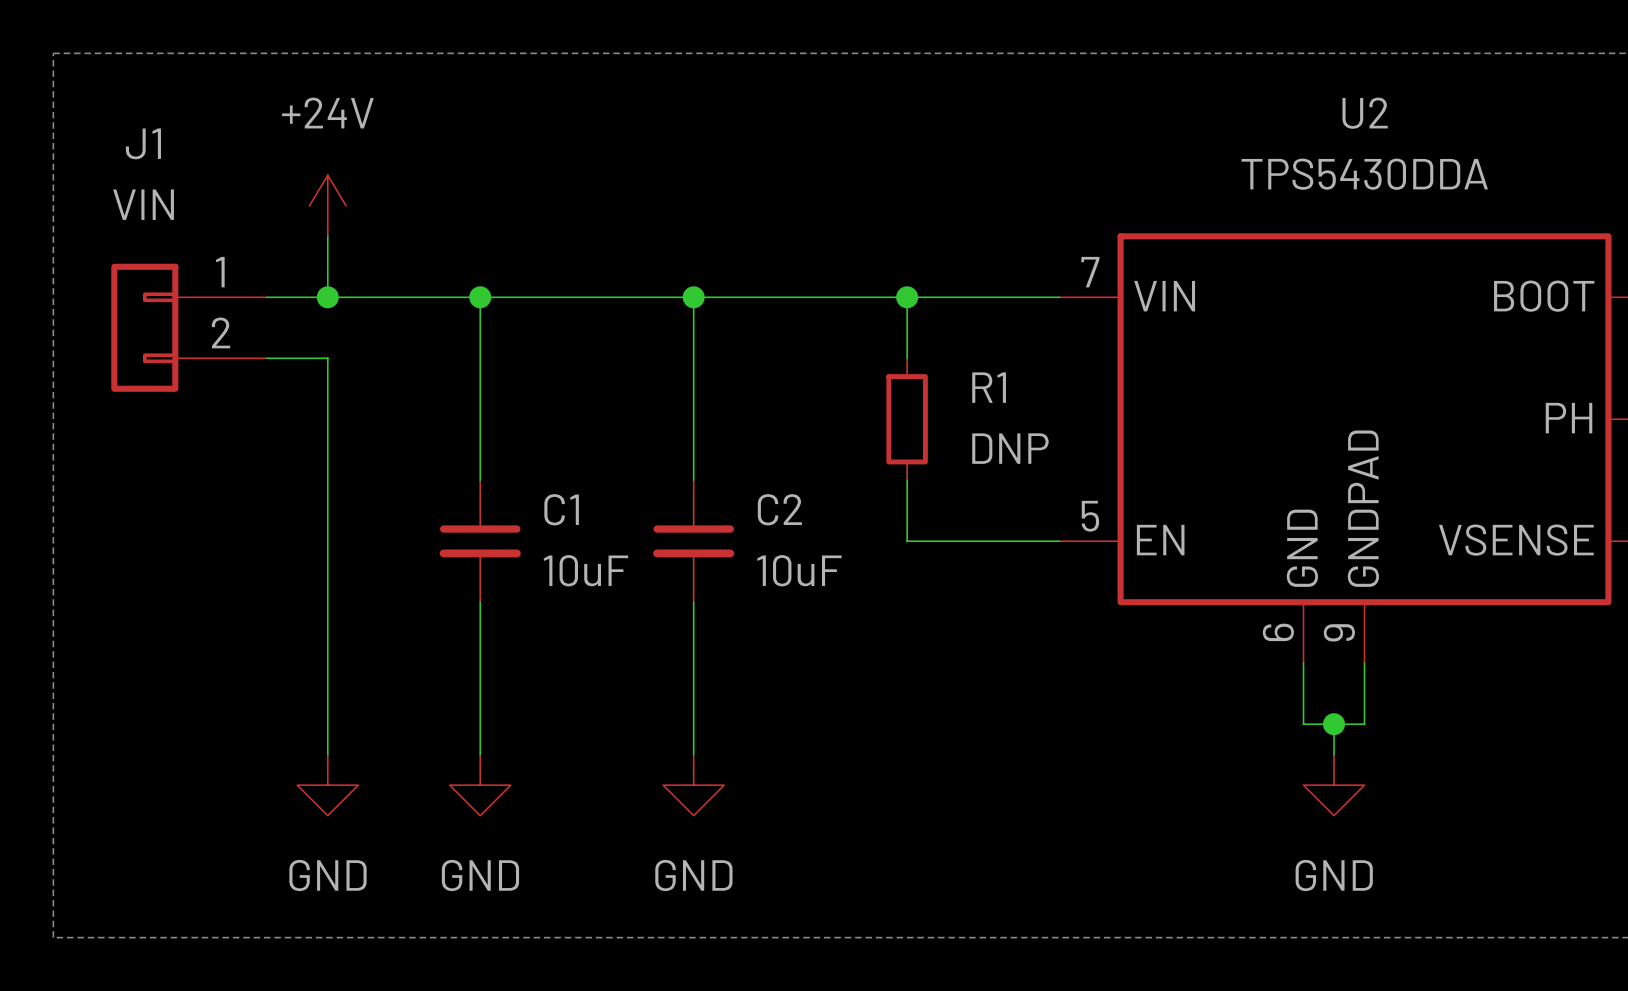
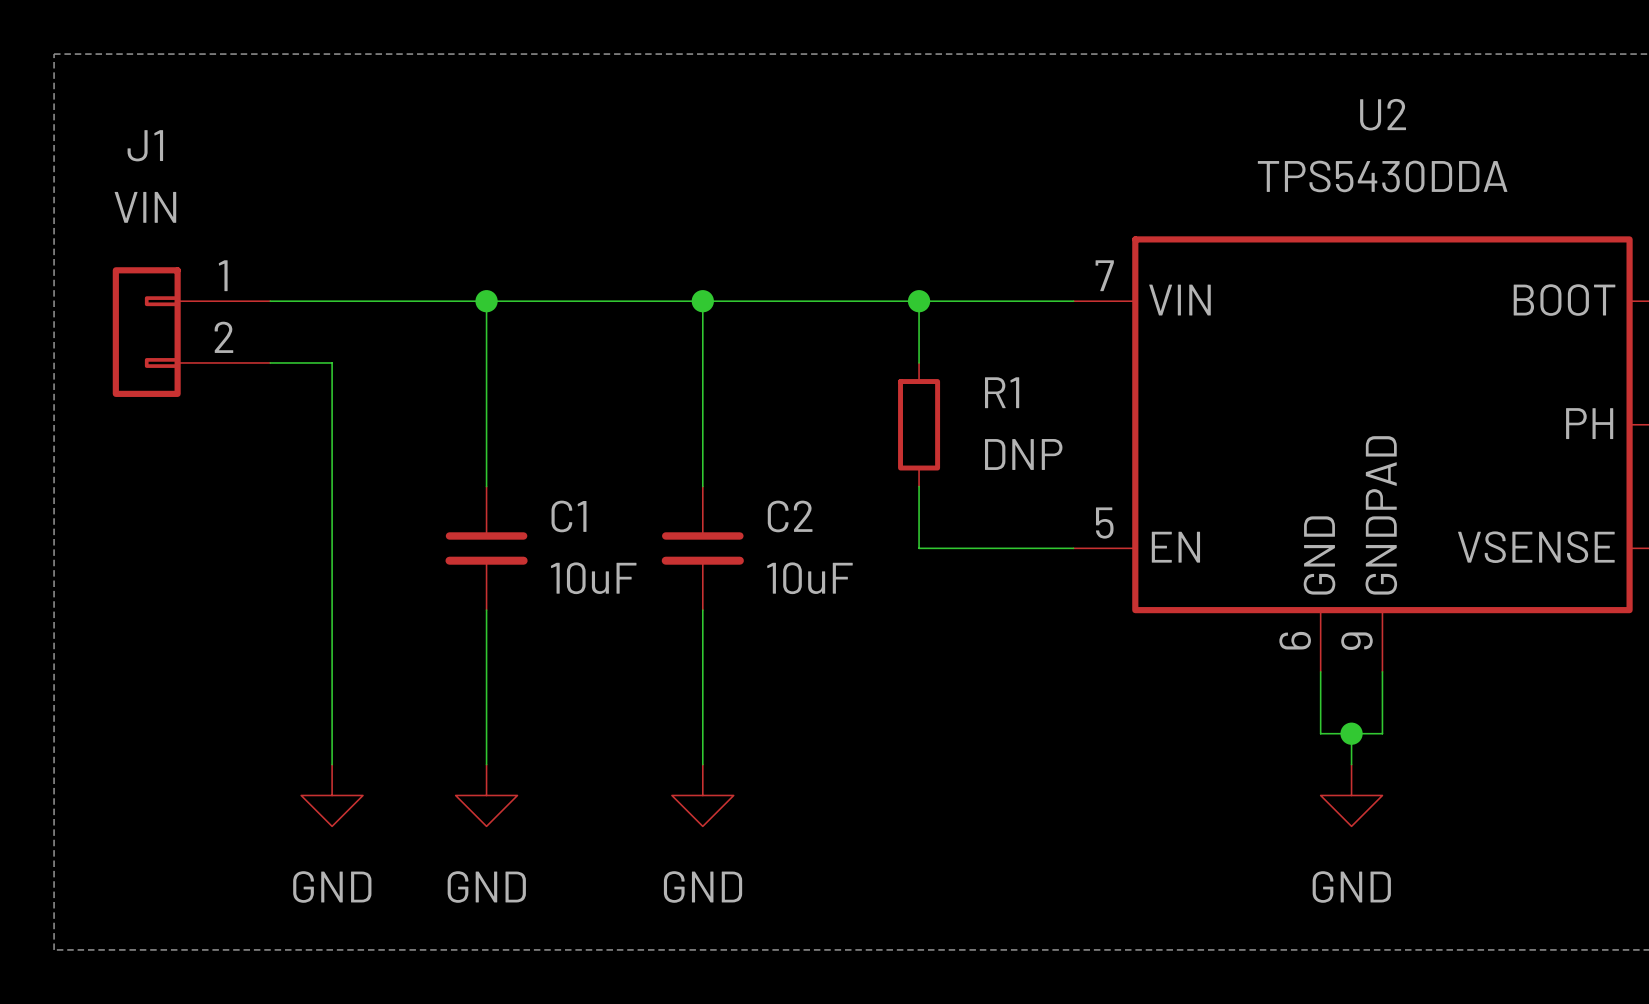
power symbol: +24V (327, 205) -> none
wire: (327, 236) (327, 297) -> none
junction: (327, 297) -> none

